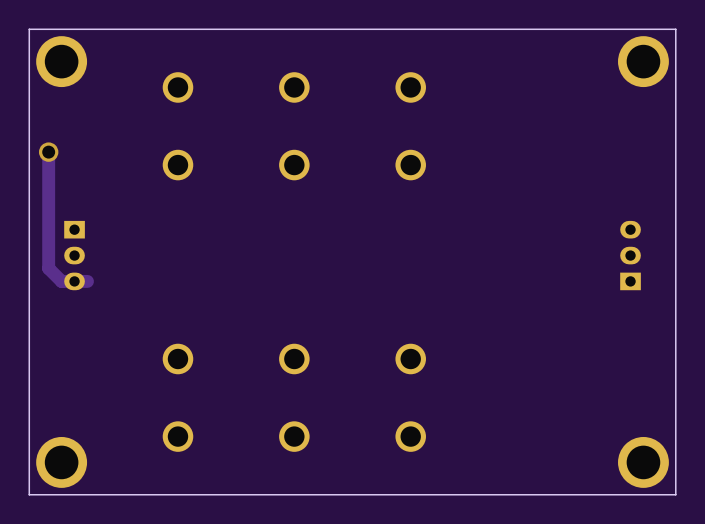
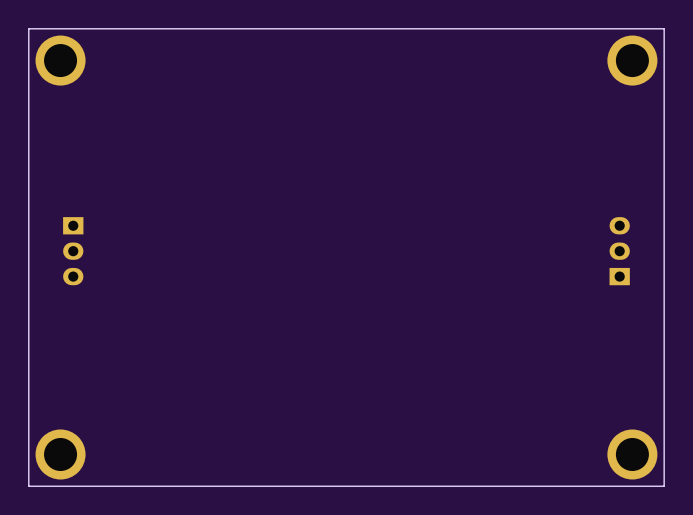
part: (177, 87) -> none
part: (294, 87) -> none
part: (410, 87) -> none
track: (48, 152) (48, 268) (61, 281) (87, 281) -> none
via: (48, 152) -> none
part: (177, 165) -> none
part: (294, 165) -> none
part: (410, 165) -> none
part: (177, 359) -> none
part: (294, 359) -> none
part: (410, 359) -> none
part: (177, 436) -> none
part: (294, 436) -> none
part: (410, 436) -> none

